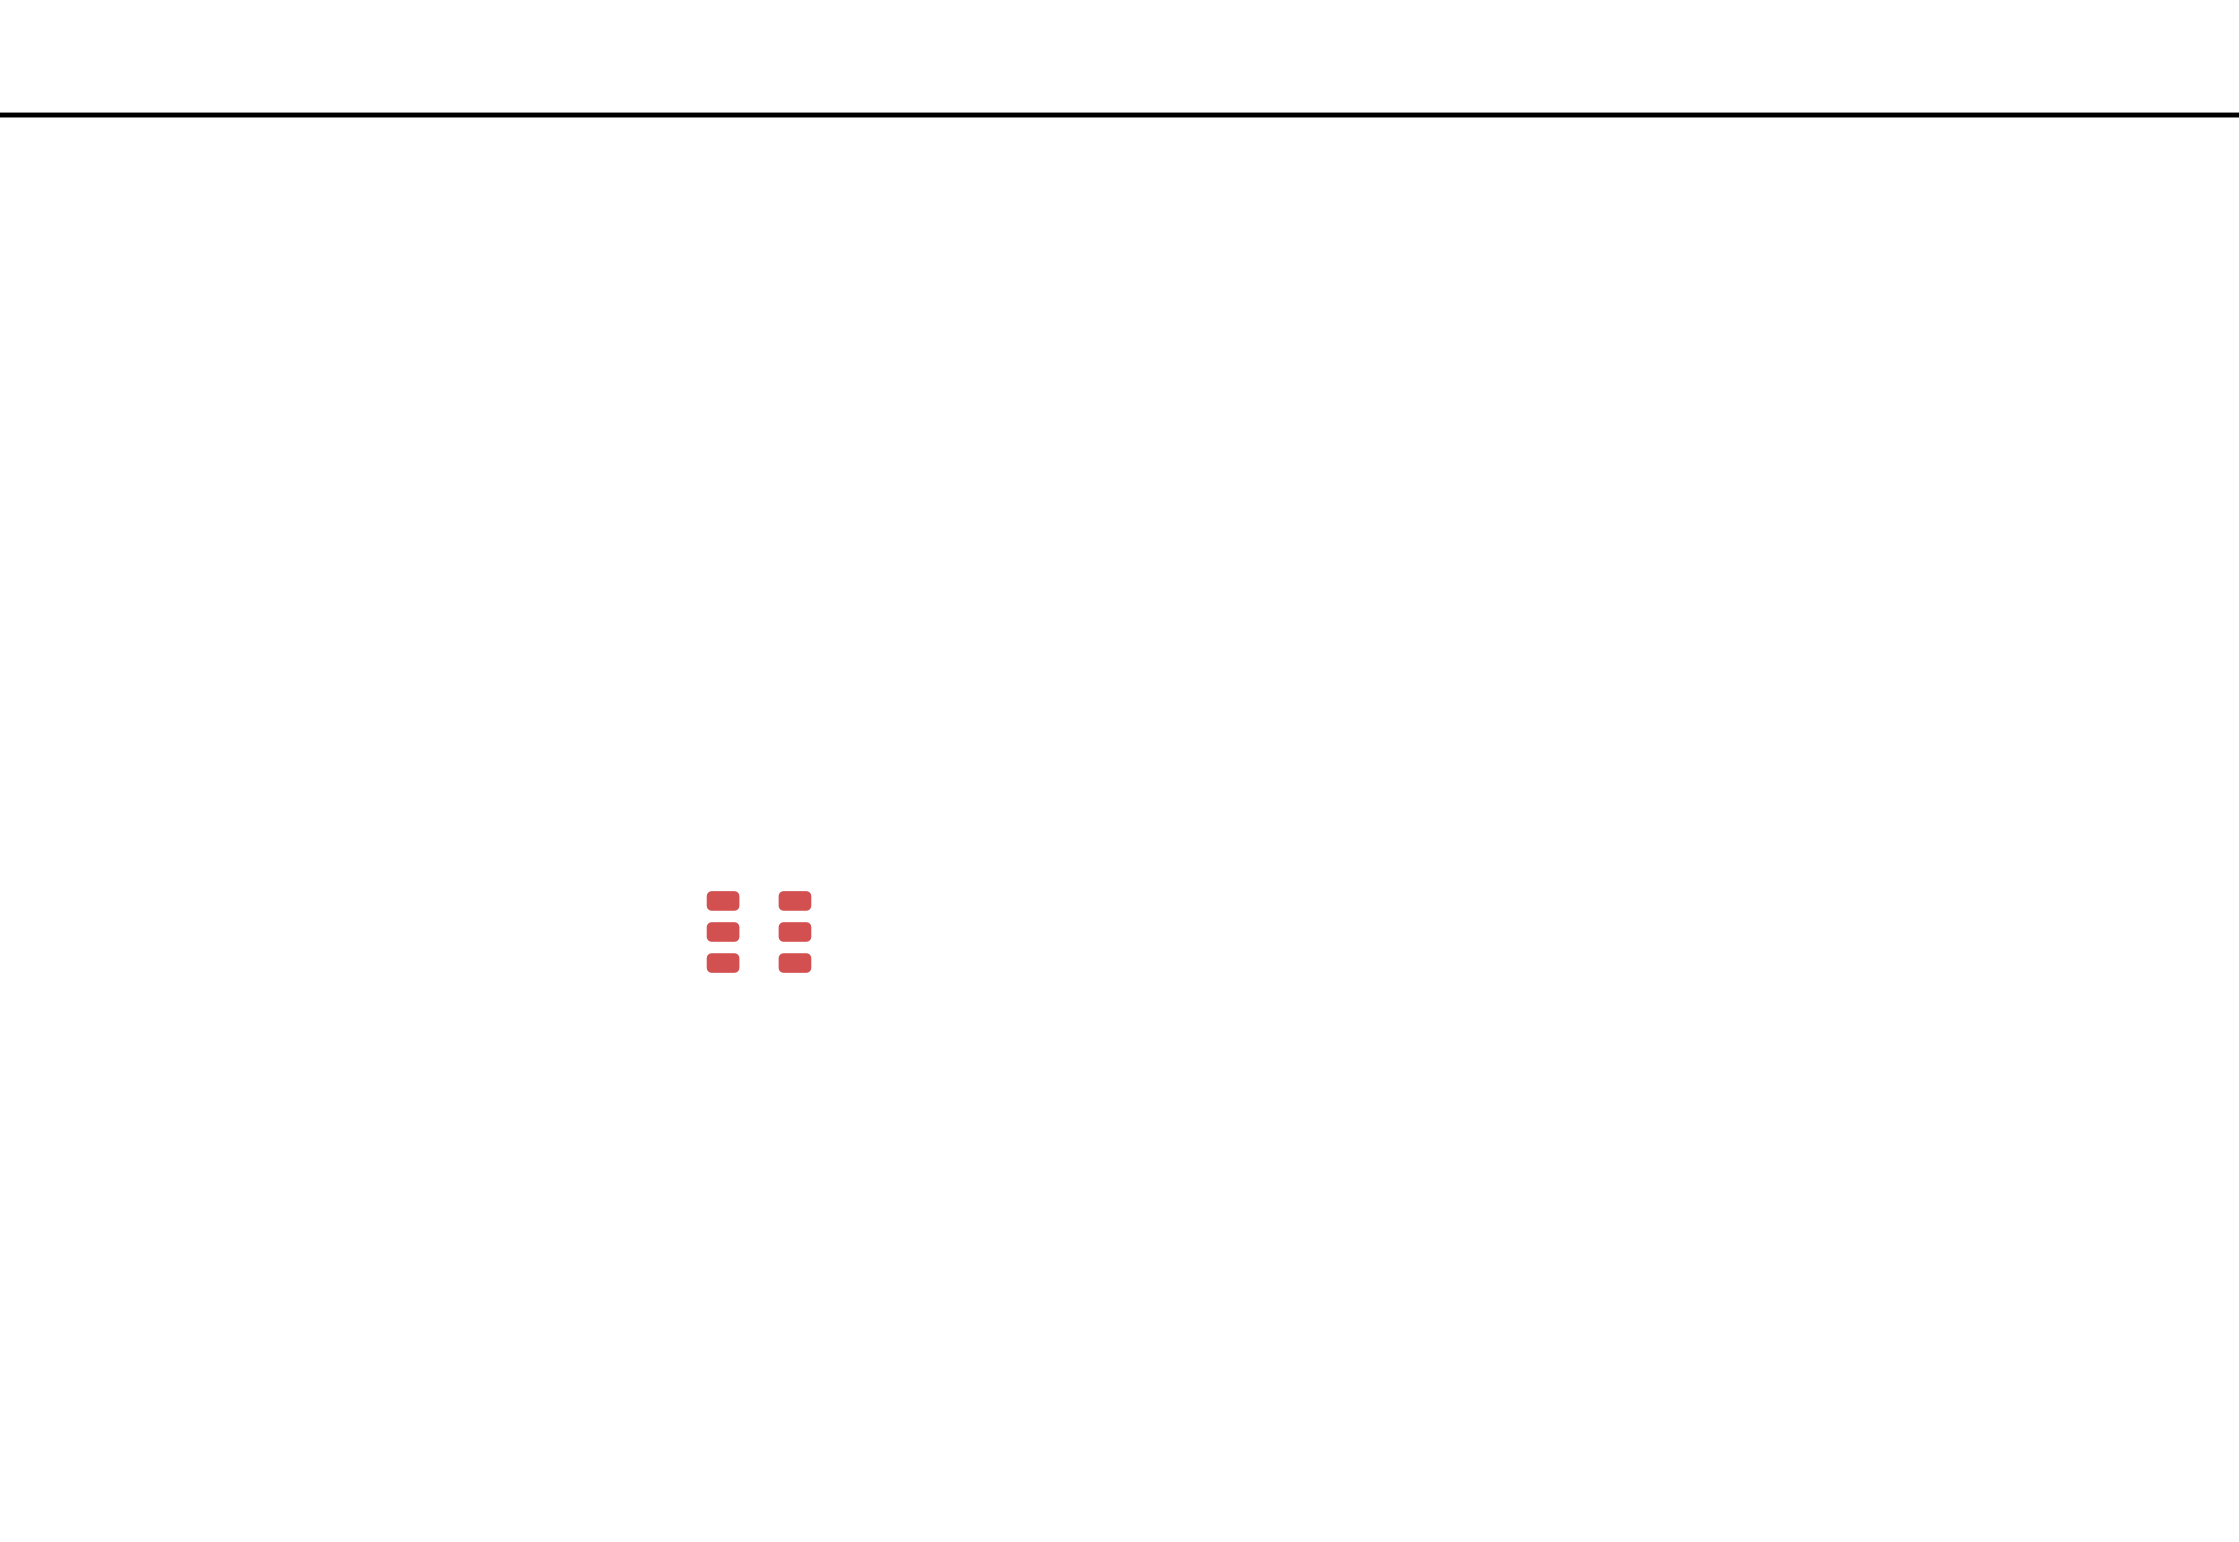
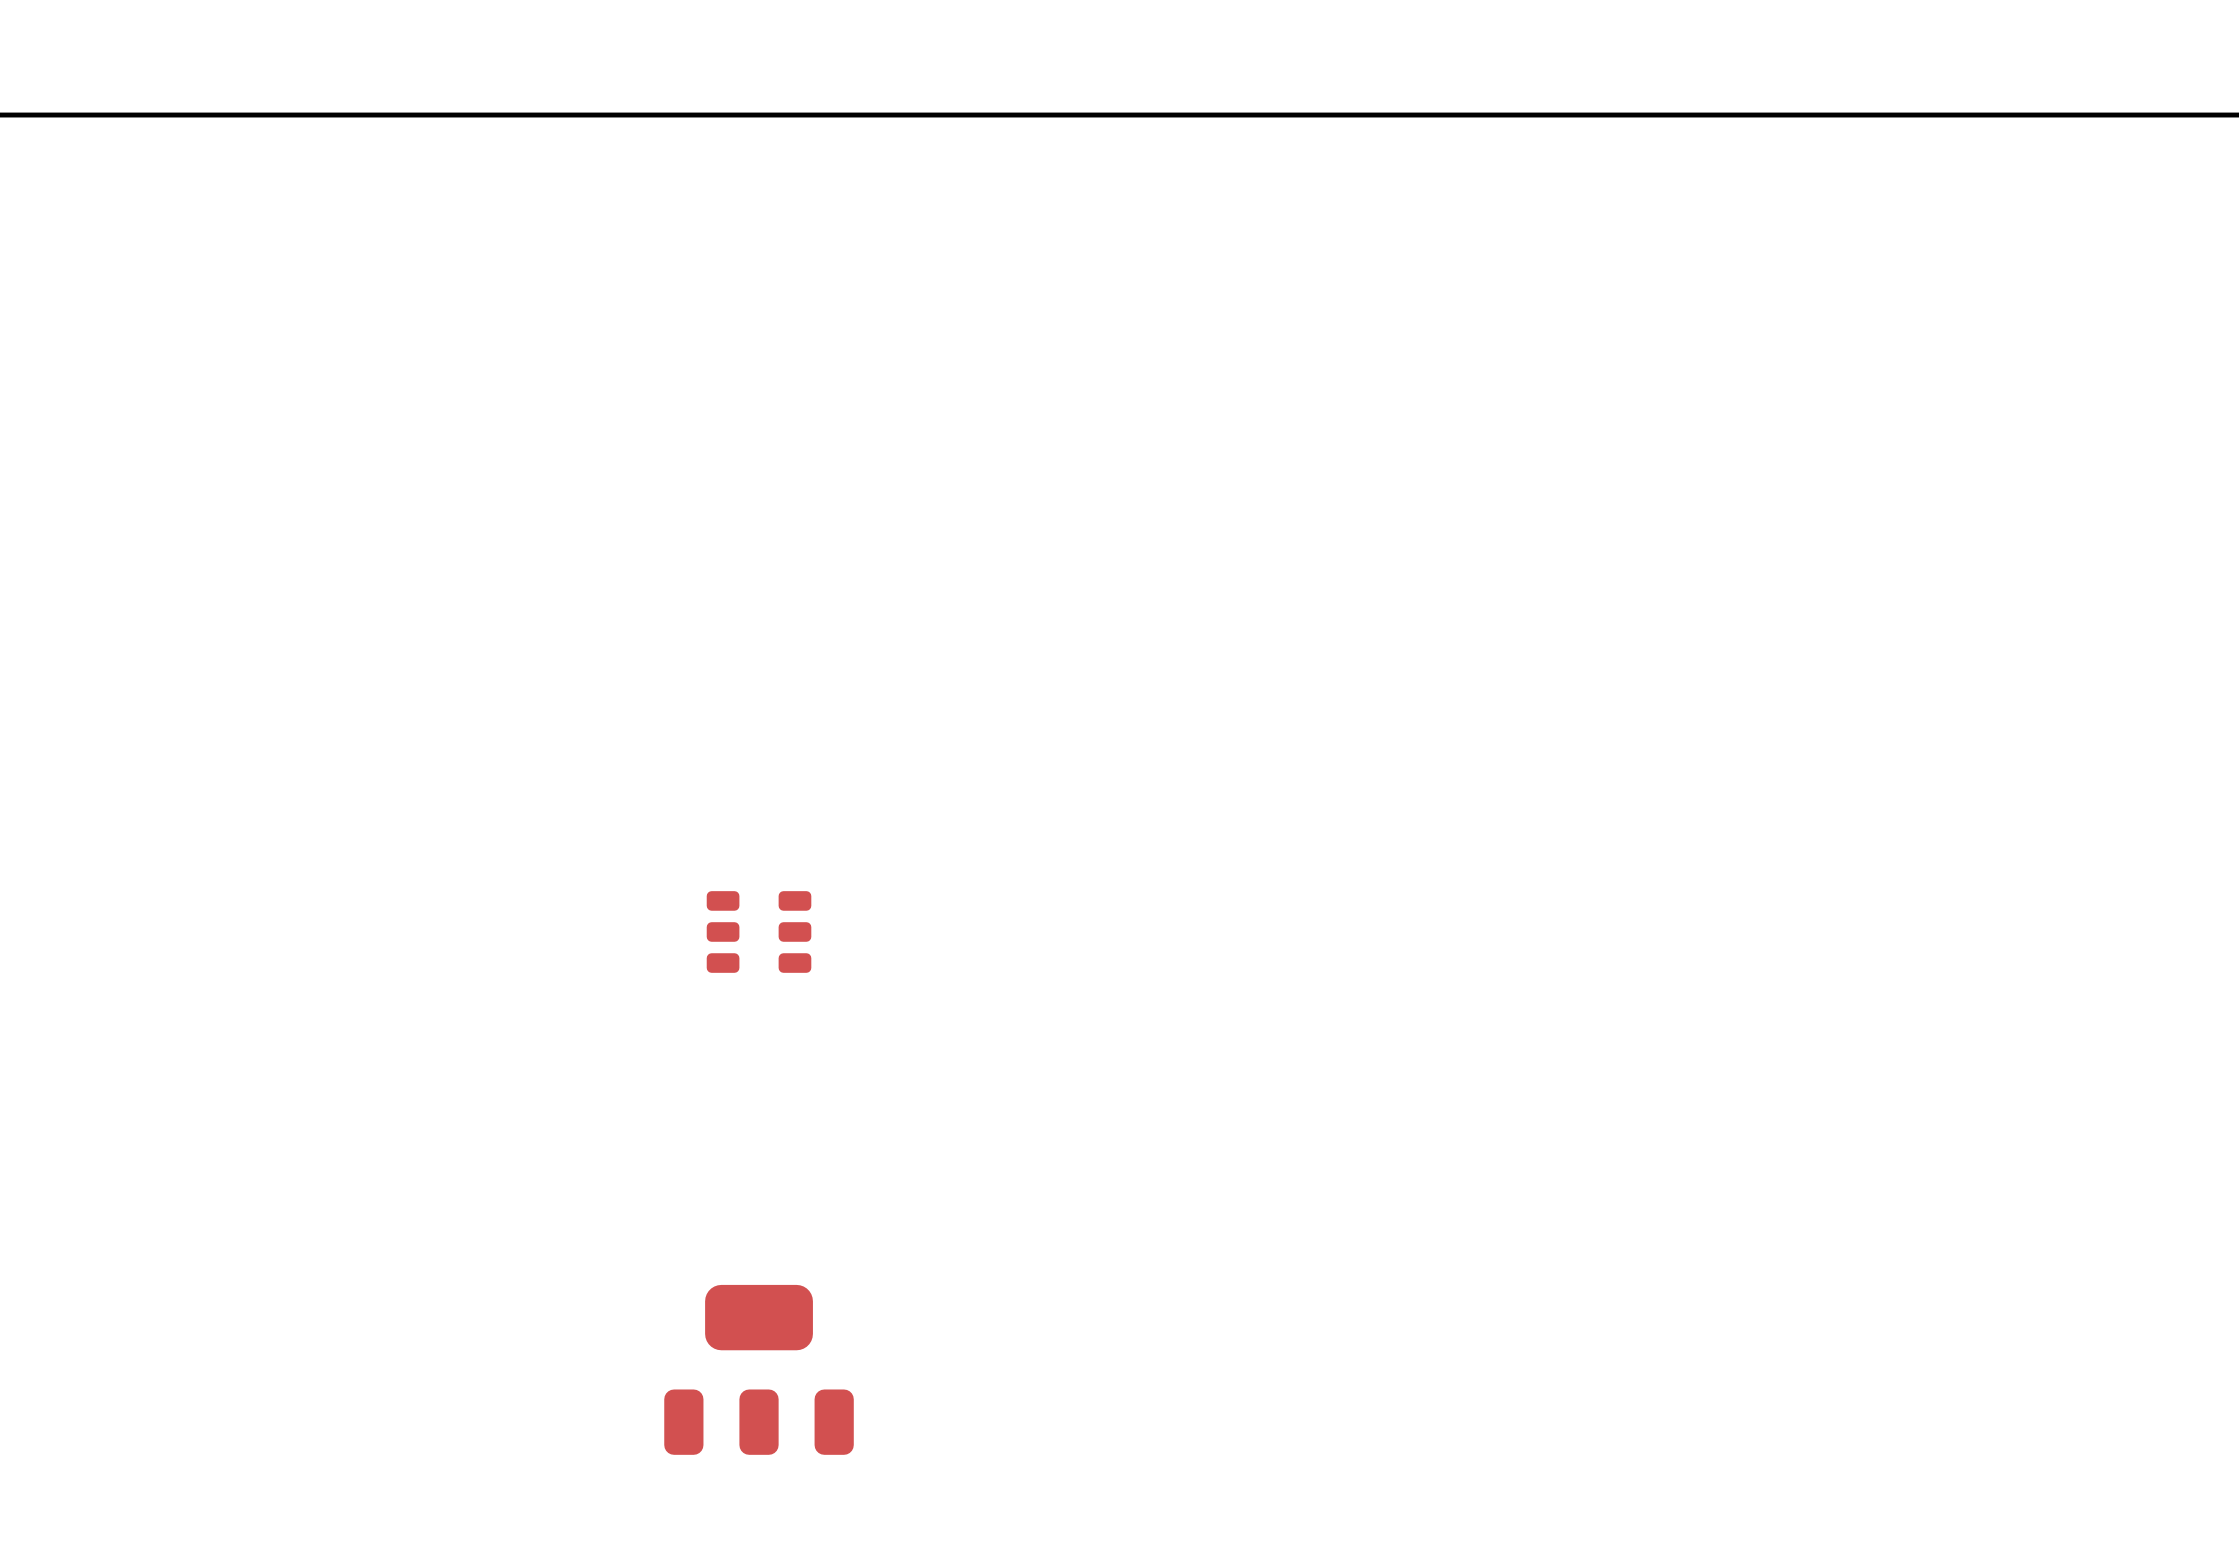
part: none -> (759, 1369)

